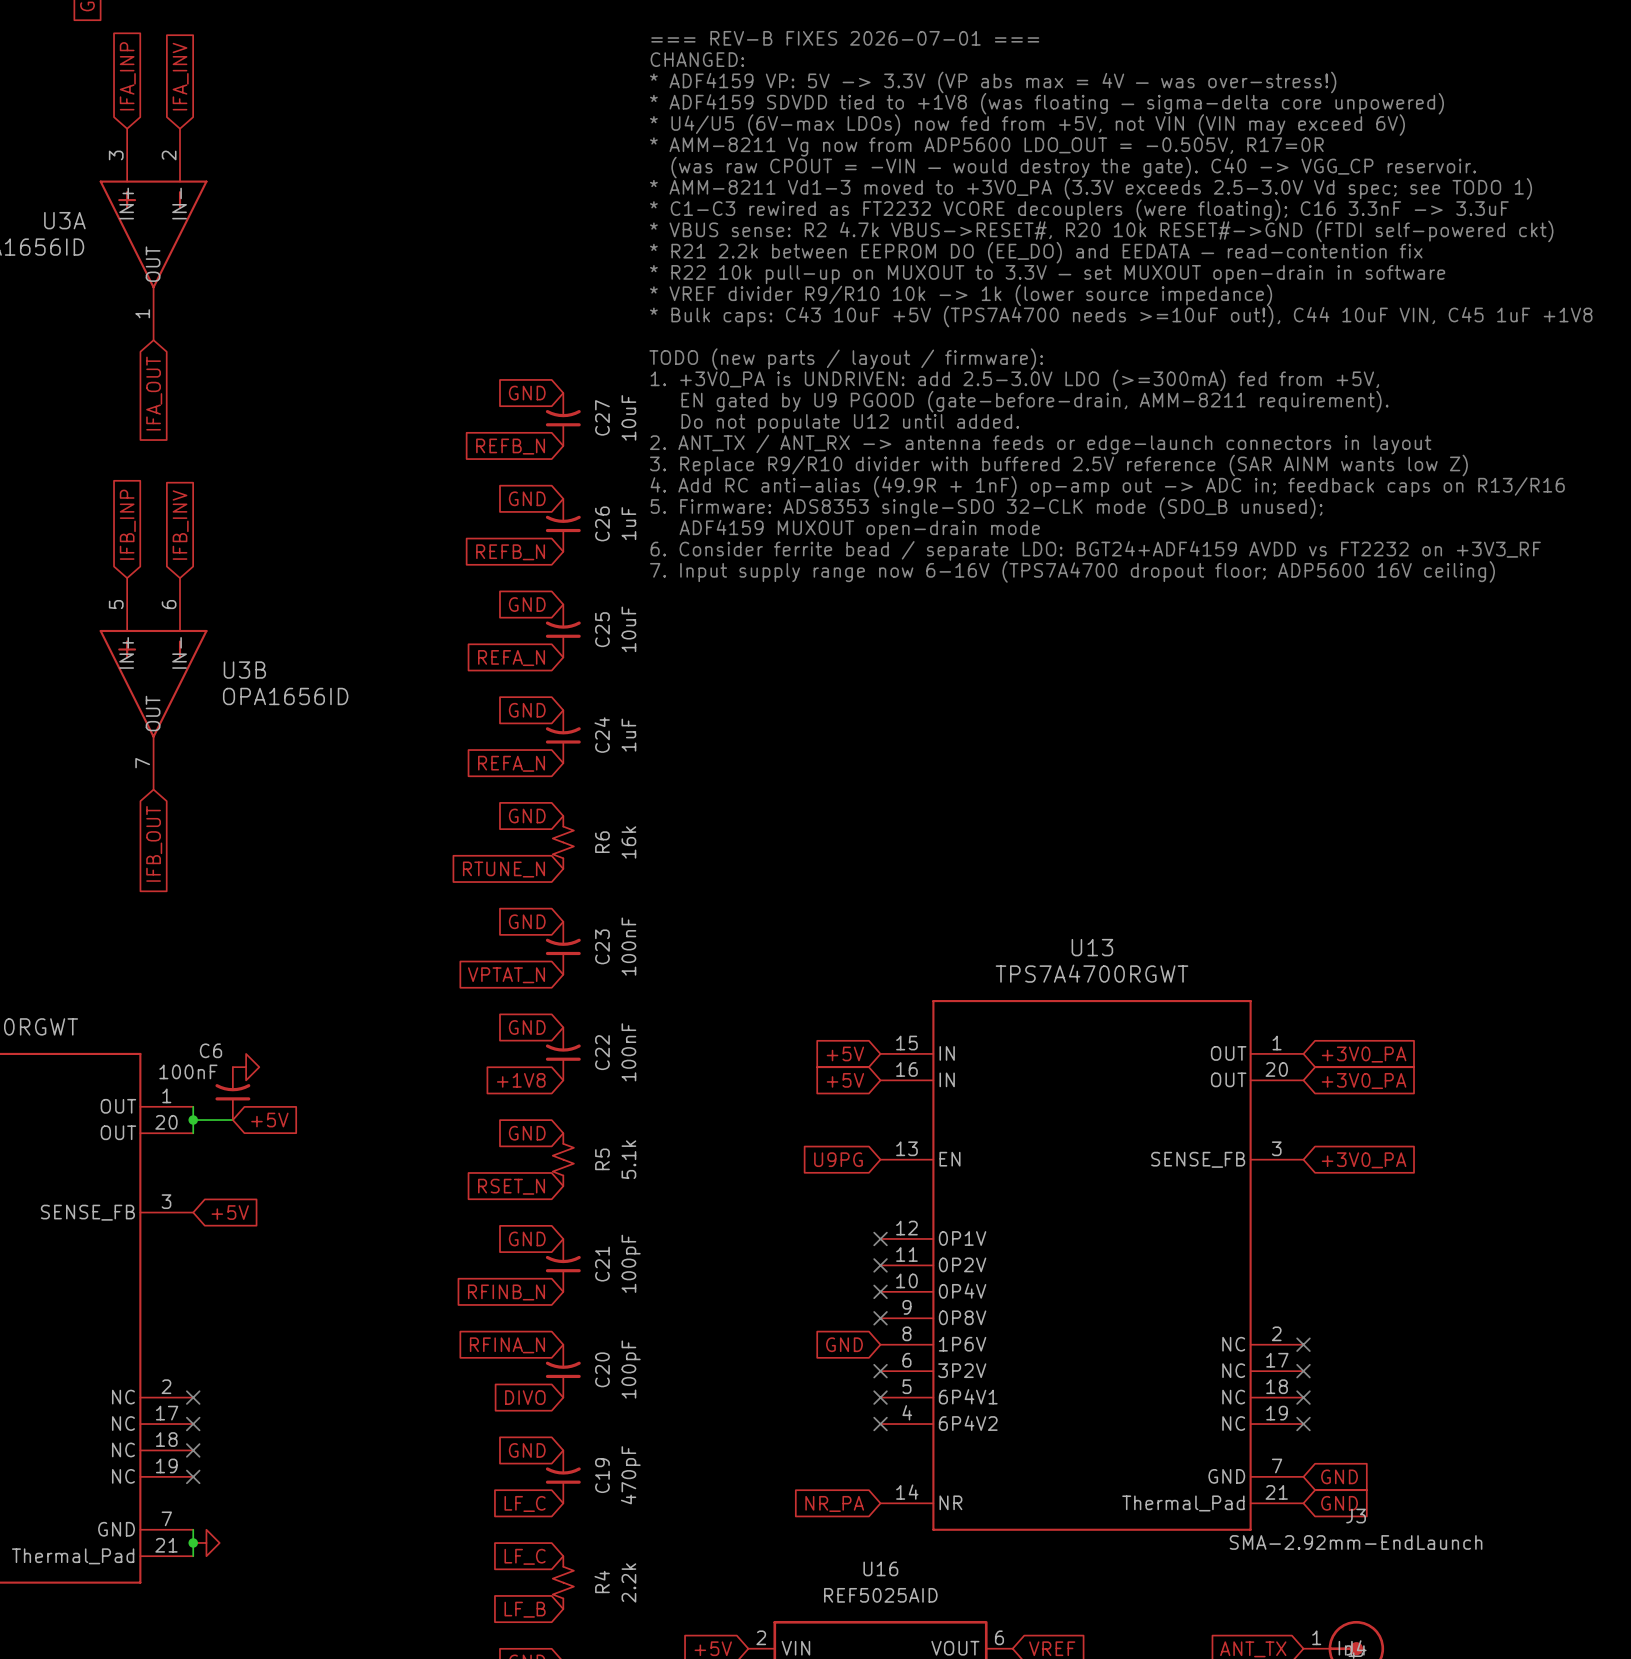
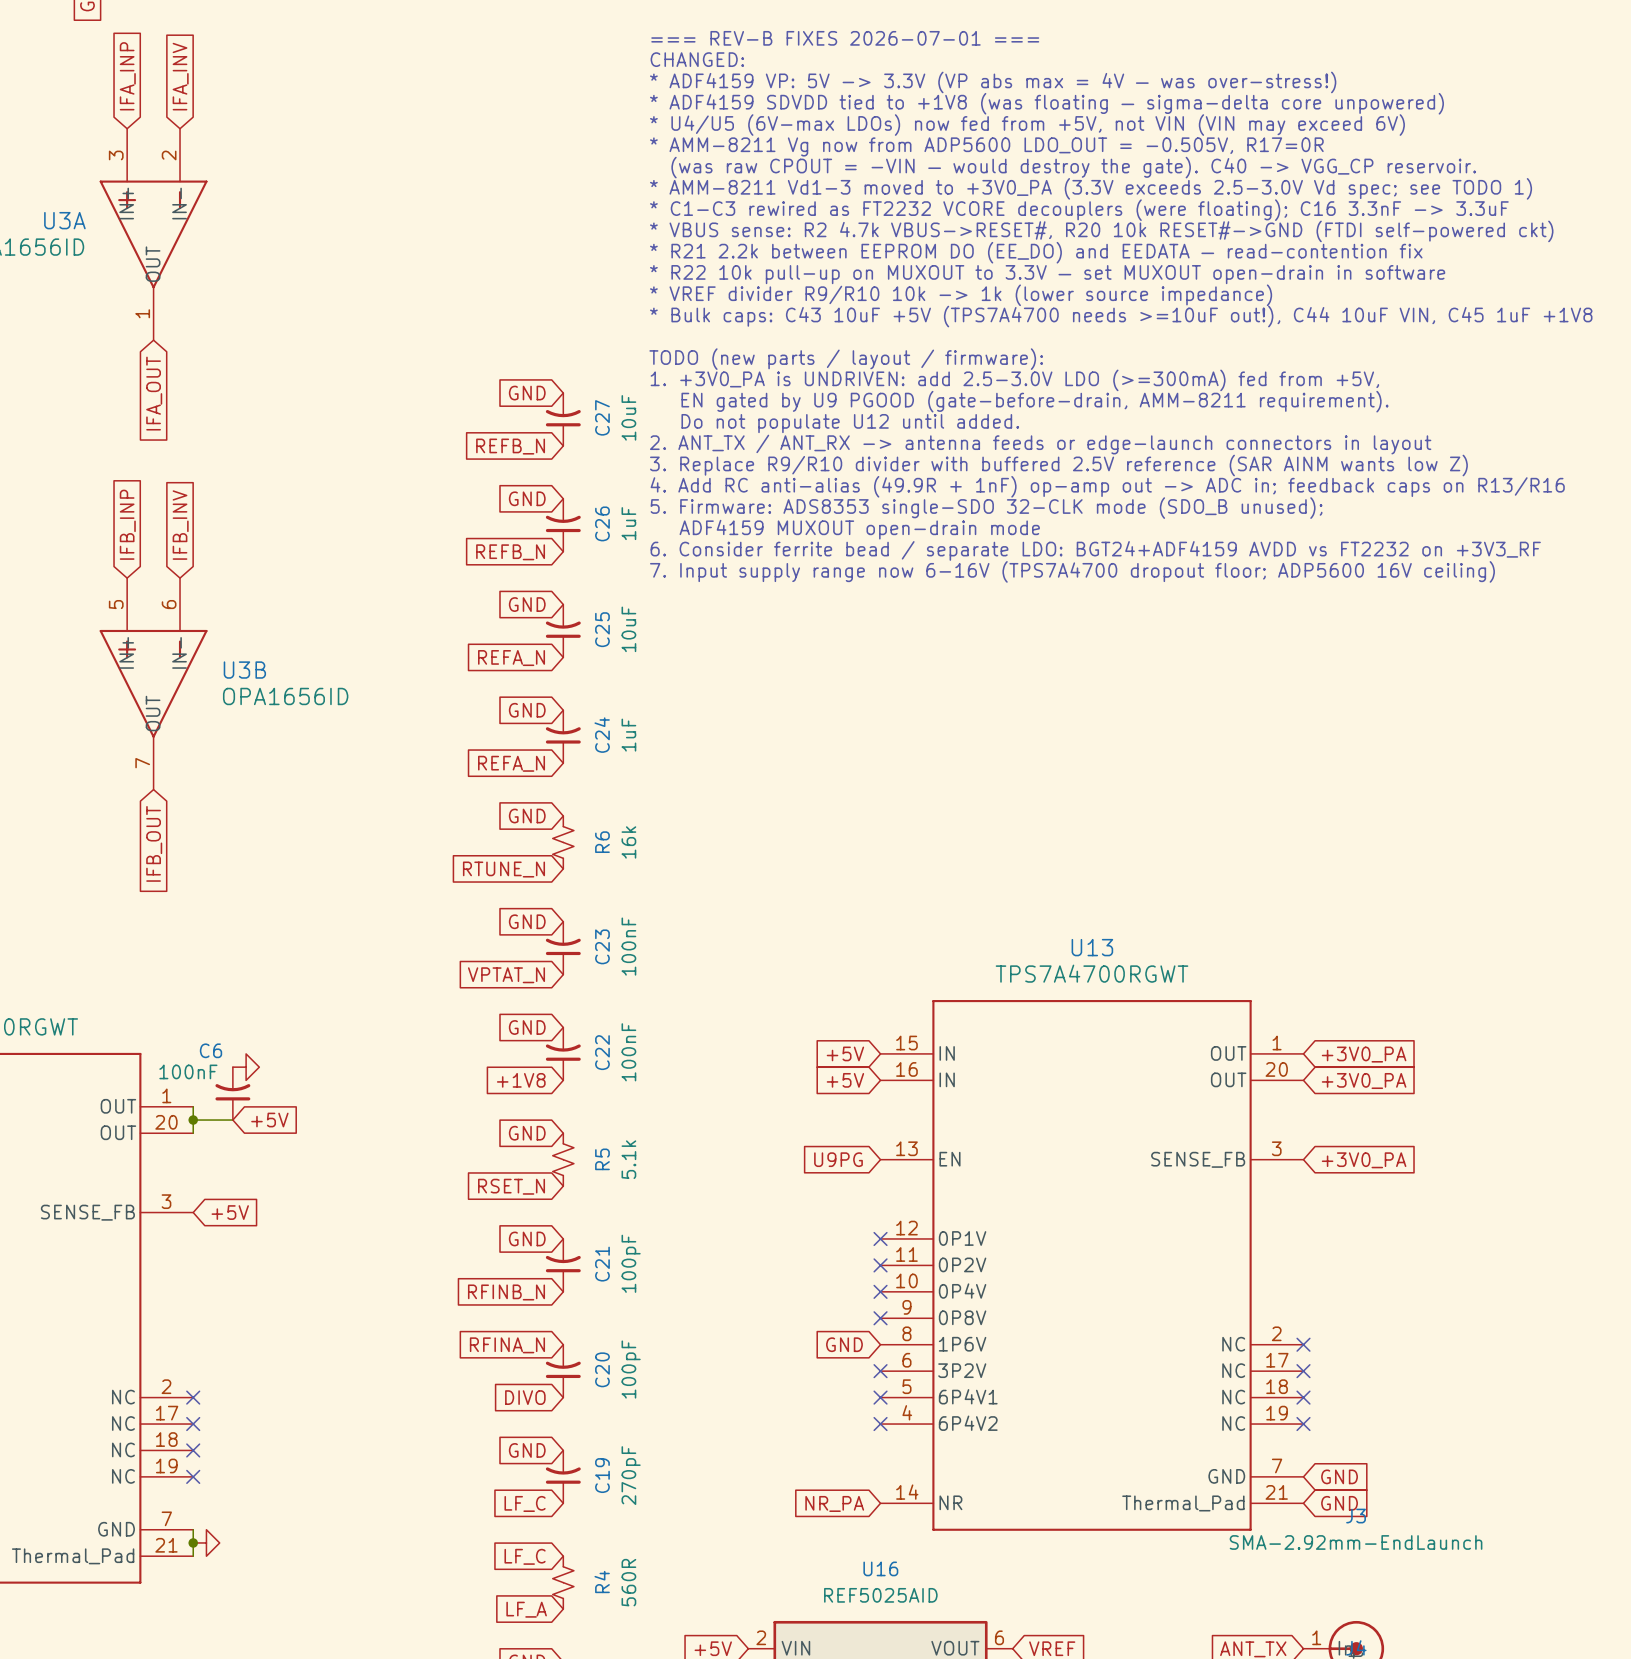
C19 value: 470pF (630, 1475) -> 270pF (631, 1475)
R4 value: 2.2k (628, 1582) -> 560R (628, 1582)
global label: LF_B (525, 1609) -> LF_A (526, 1609)

